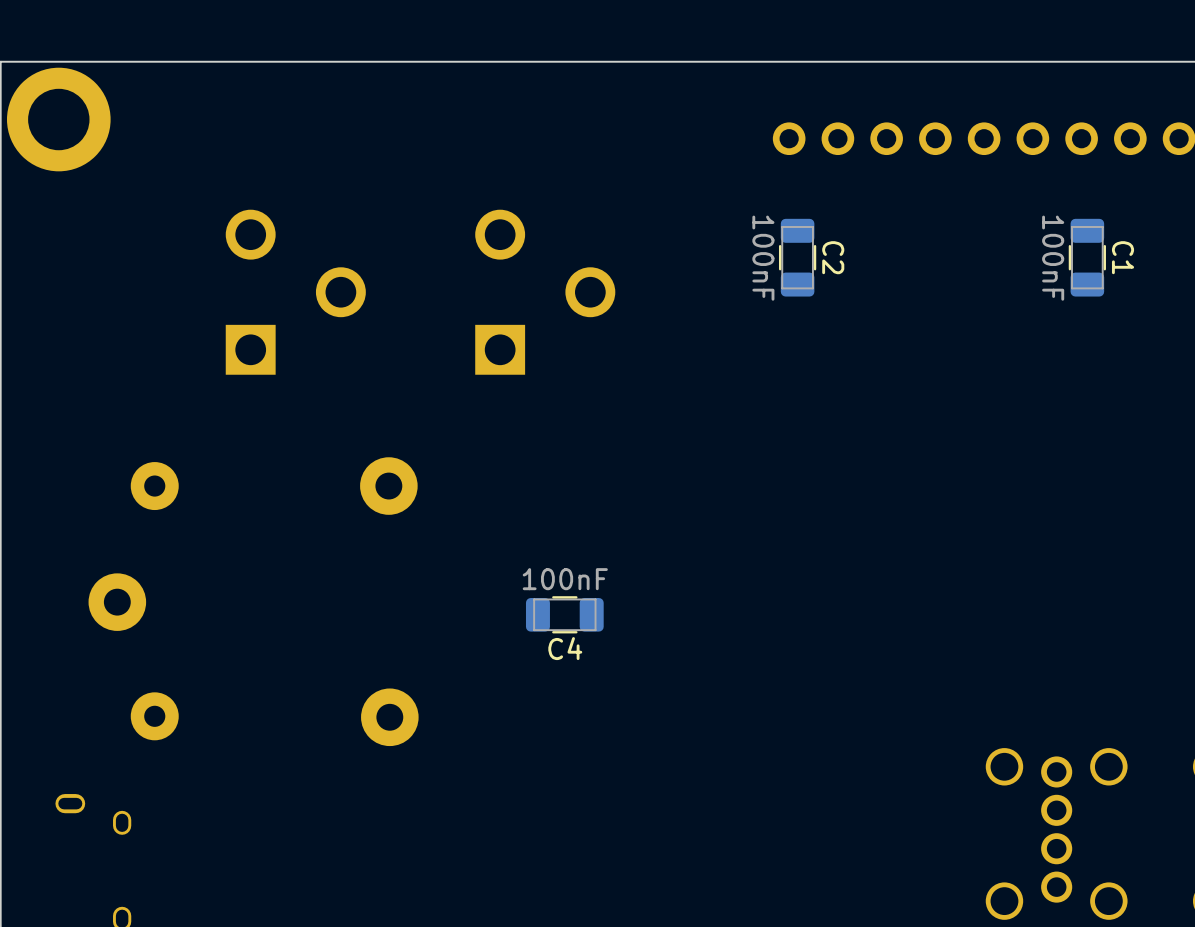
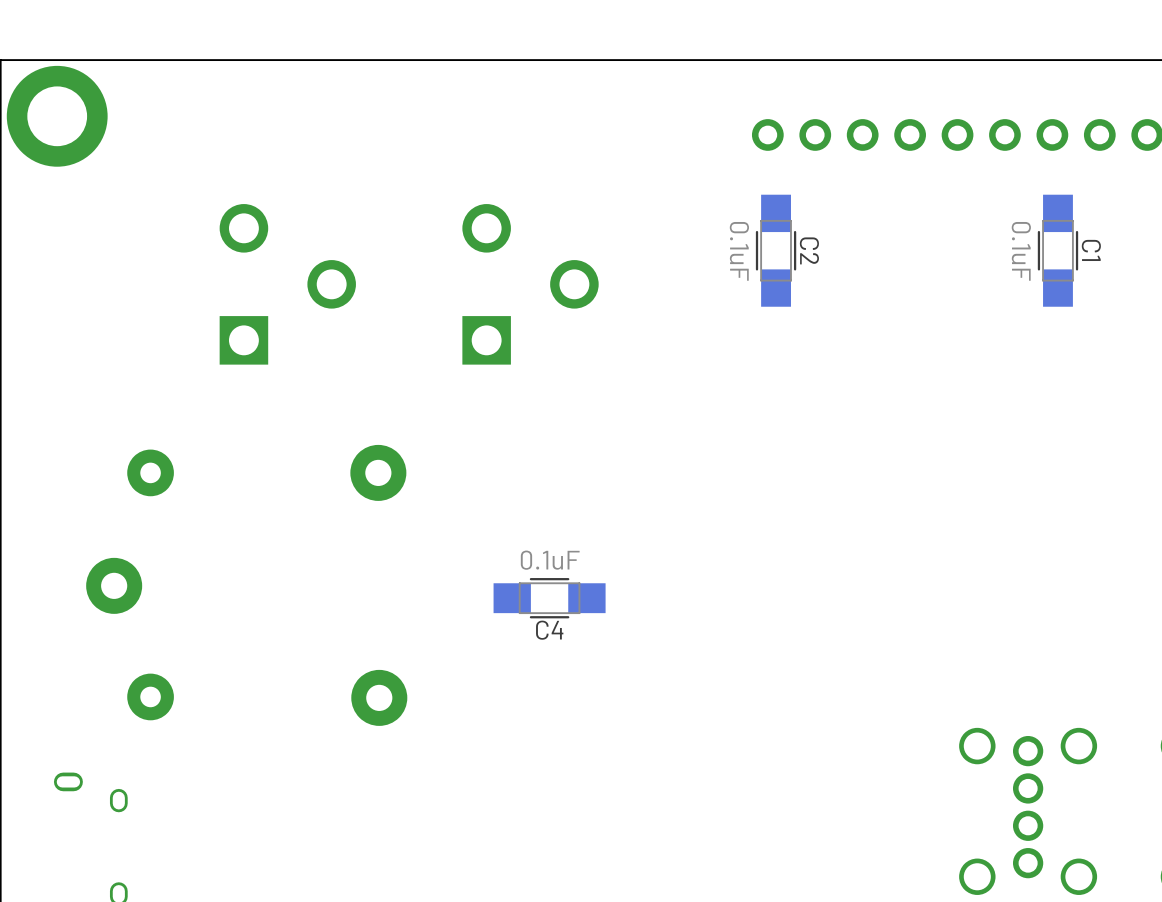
C2 footprint: [778, 218, 817, 297] -> [755, 194, 797, 307]
C1 footprint: [1068, 218, 1106, 297] -> [1037, 194, 1079, 307]
C2 value: 100nF (763, 258) -> 0.1uF (739, 251)
C1 value: 100nF (1053, 258) -> 0.1uF (1021, 251)
C4 value: 100nF (565, 579) -> 0.1uF (550, 560)
C4 footprint: [525, 596, 604, 634] -> [493, 578, 606, 619]

